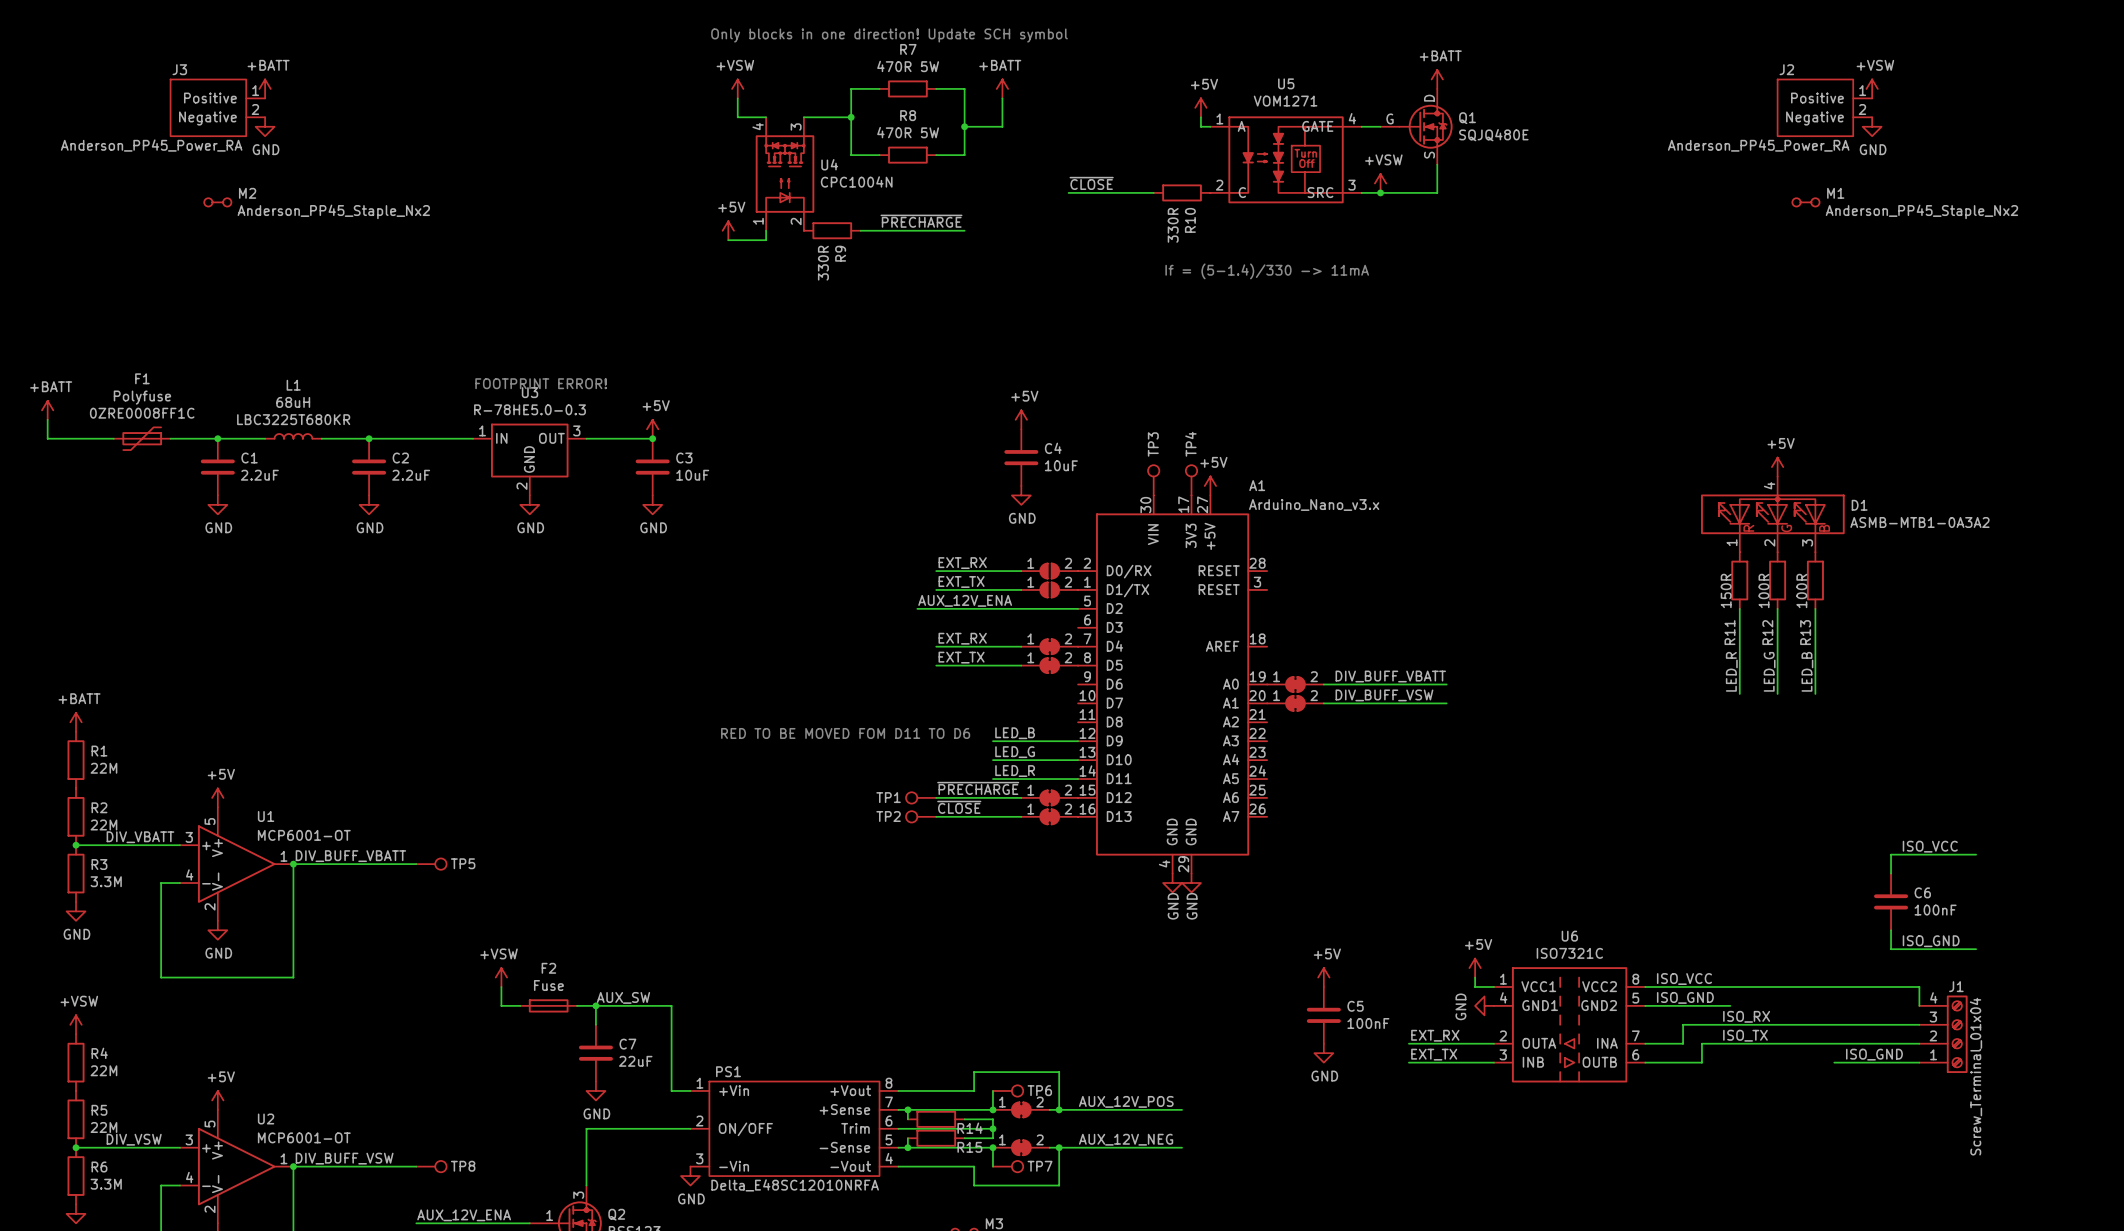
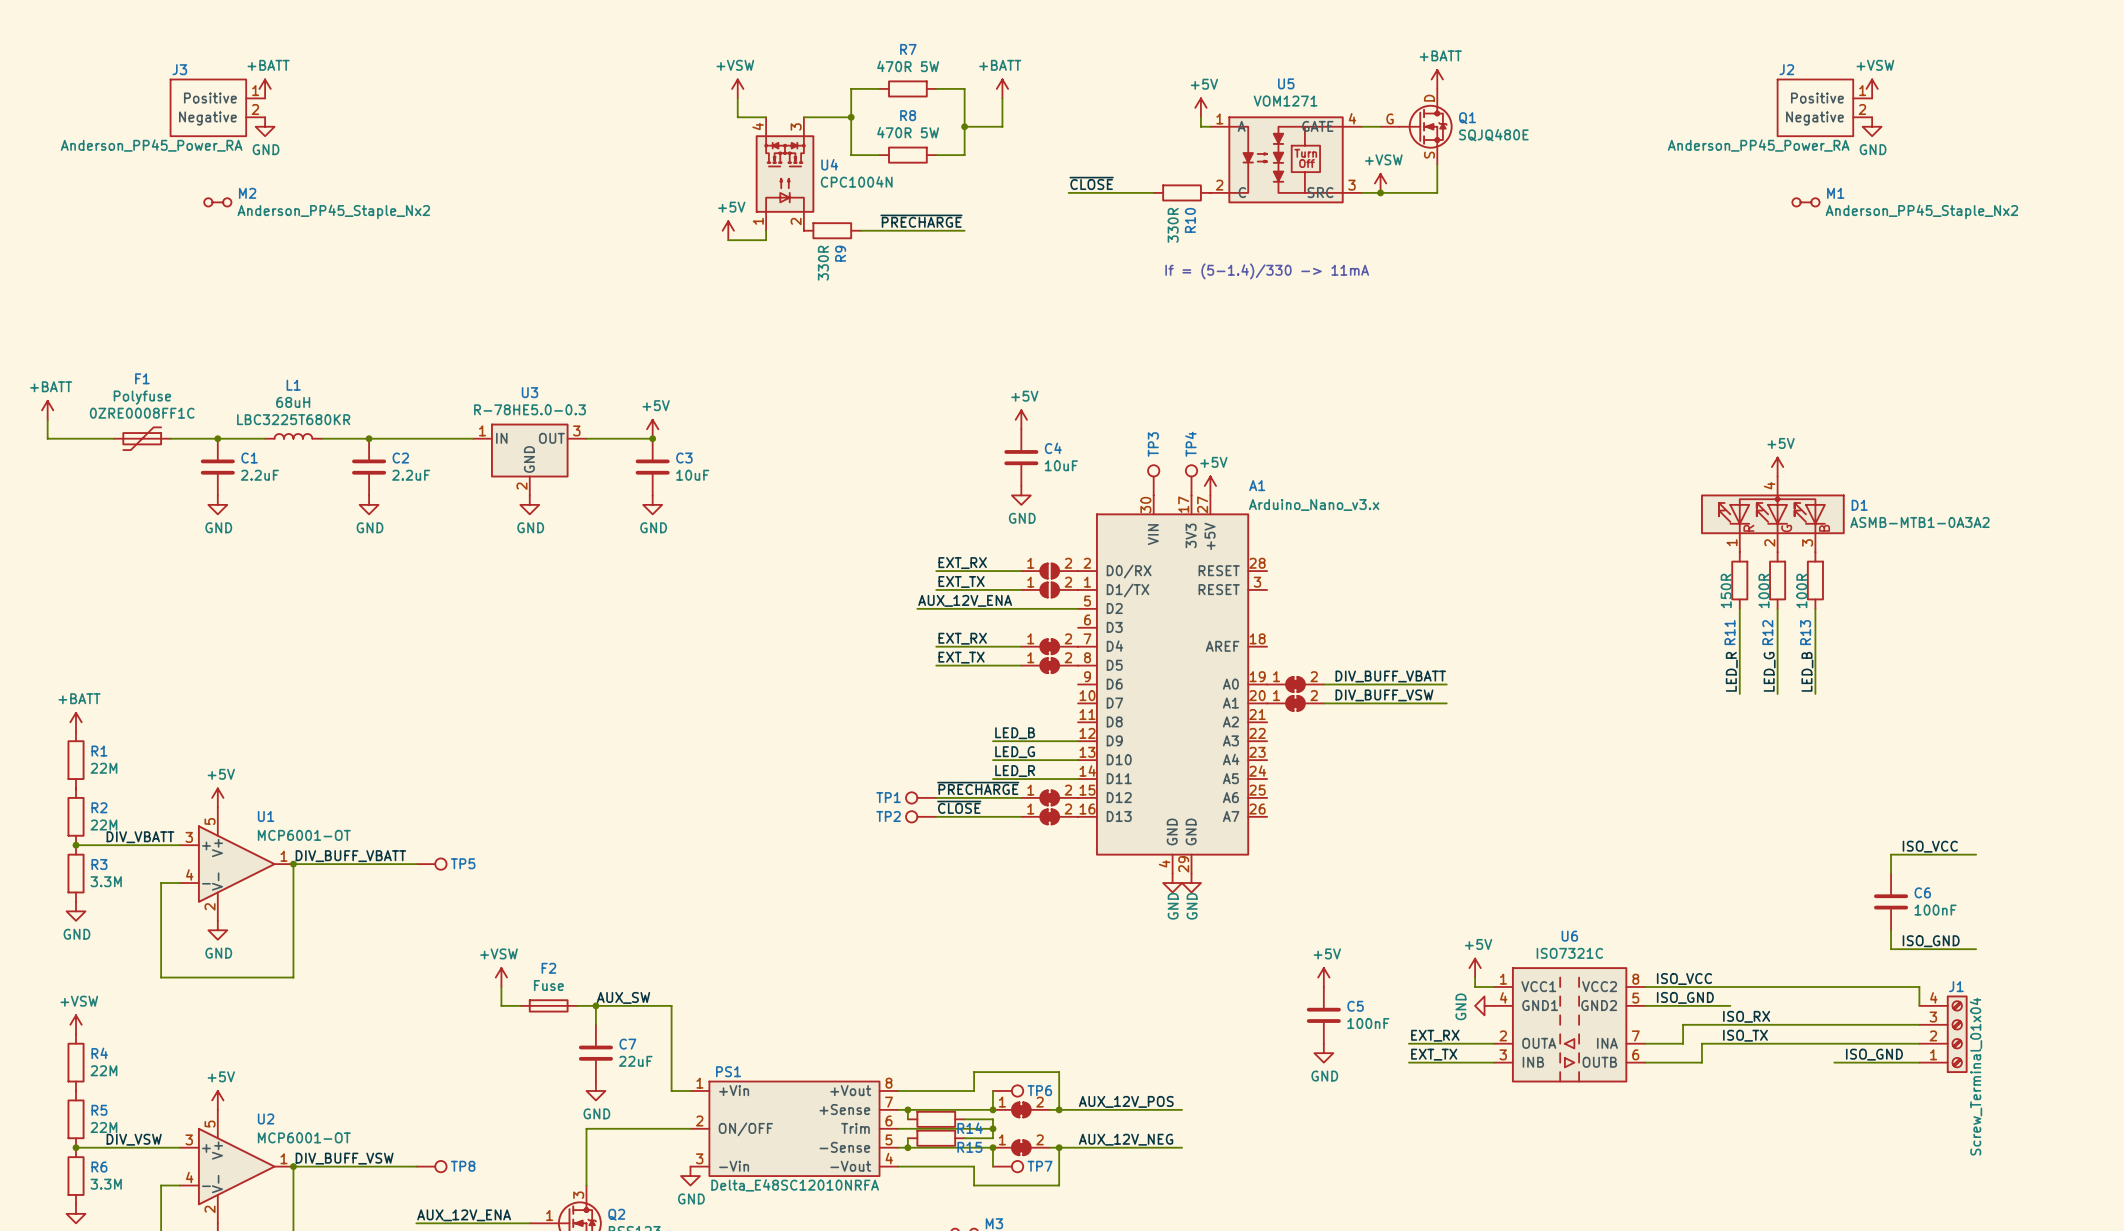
text: Only blocks in one direction! Update SCH symbol (889, 35) -> none
text: FOOTPRINT ERROR! (541, 383) -> none
text: RED TO BE MOVED FOM D11 TO D6 (845, 733) -> none

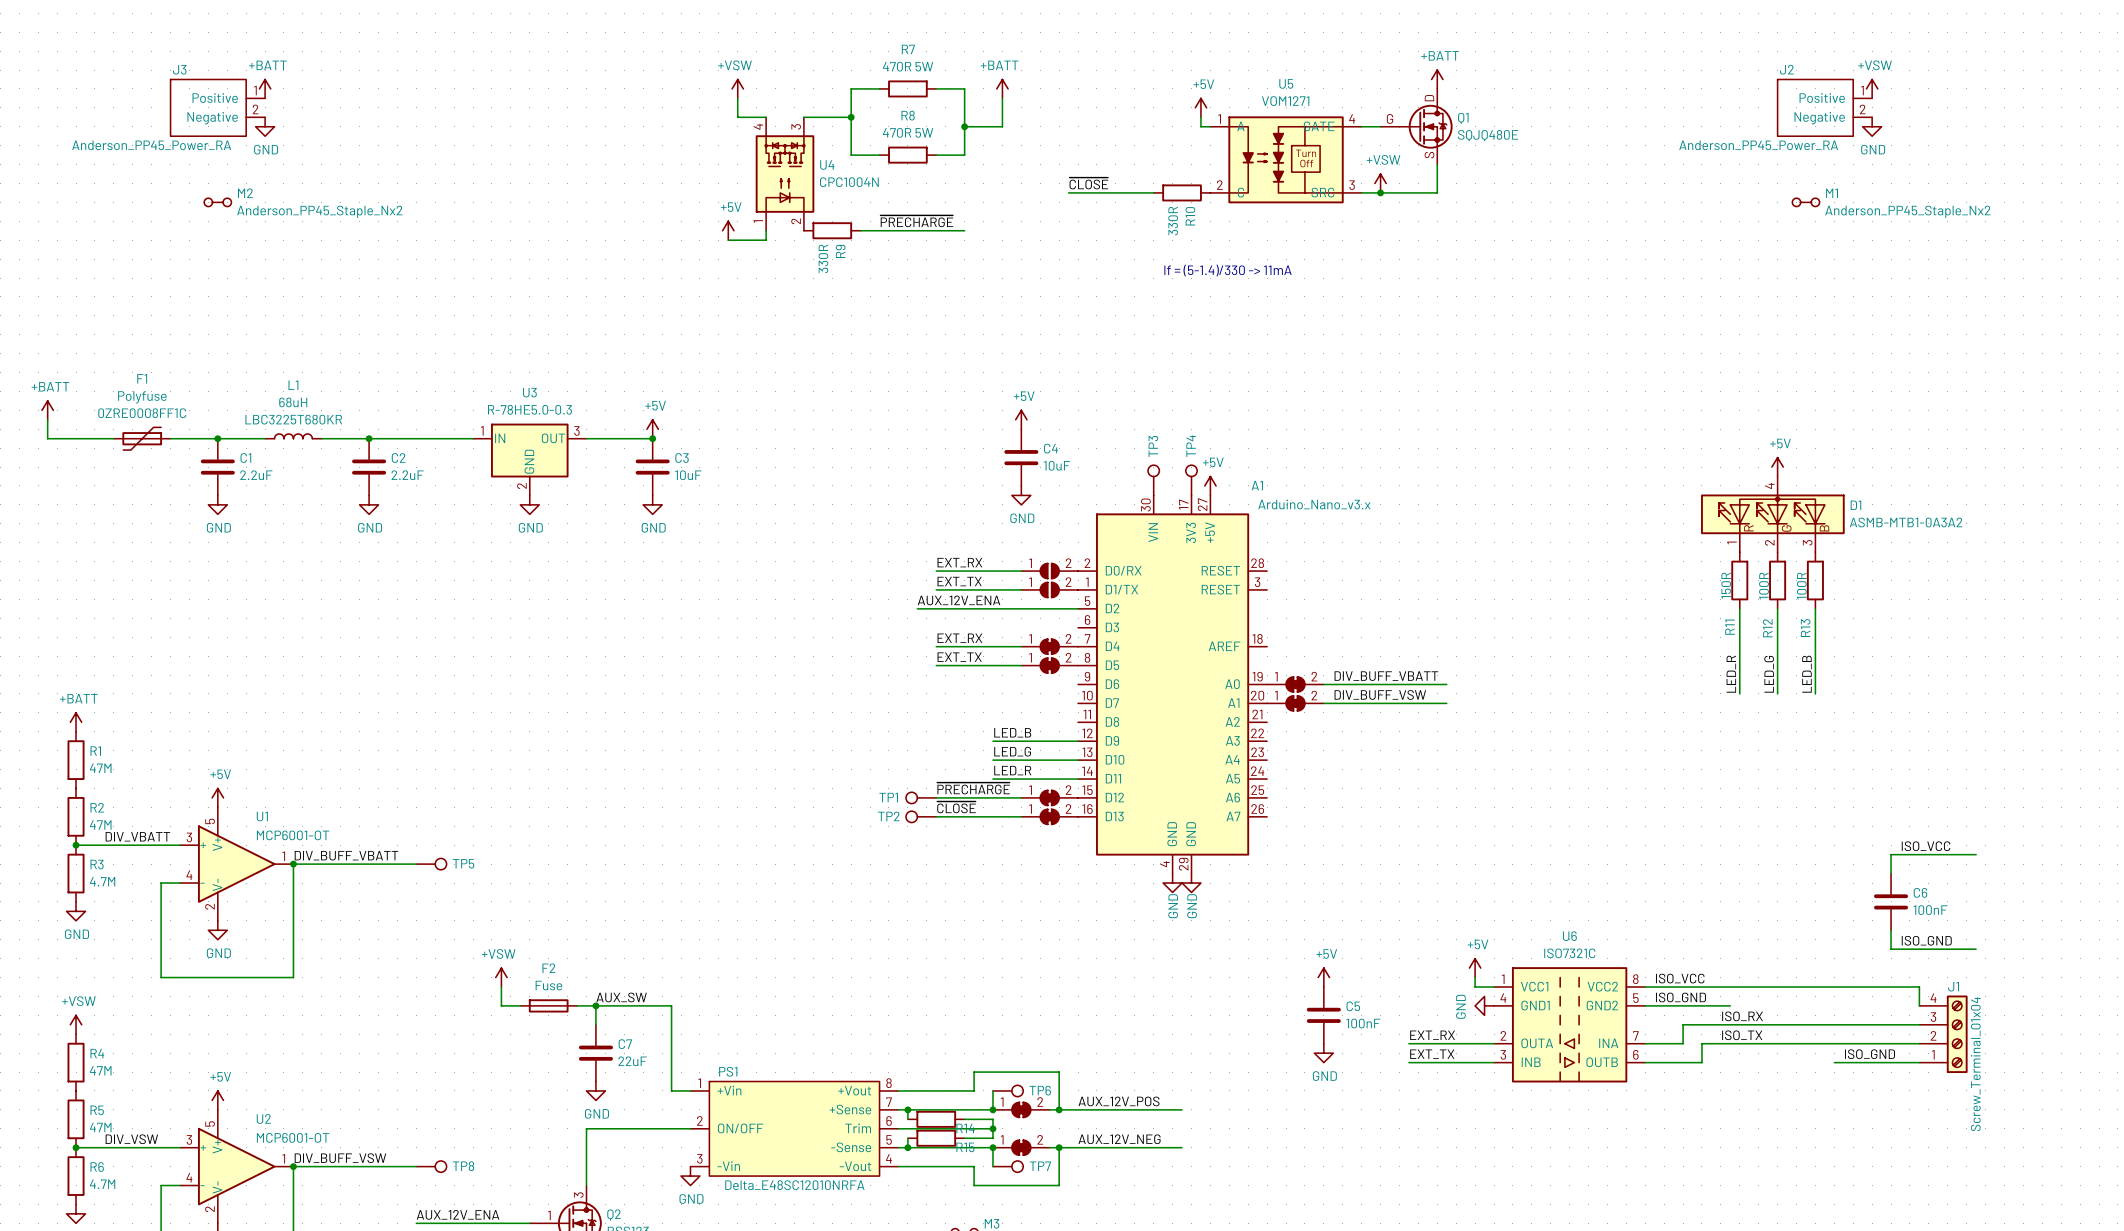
R1 value: 22M (103, 768) -> 47M (100, 768)
R2 value: 22M (103, 824) -> 47M (100, 824)
R3 value: 3.3M (106, 881) -> 4.7M (102, 881)
R4 value: 22M (103, 1070) -> 47M (100, 1070)
R5 value: 22M (103, 1127) -> 47M (100, 1127)
R6 value: 3.3M (106, 1184) -> 4.7M (102, 1184)

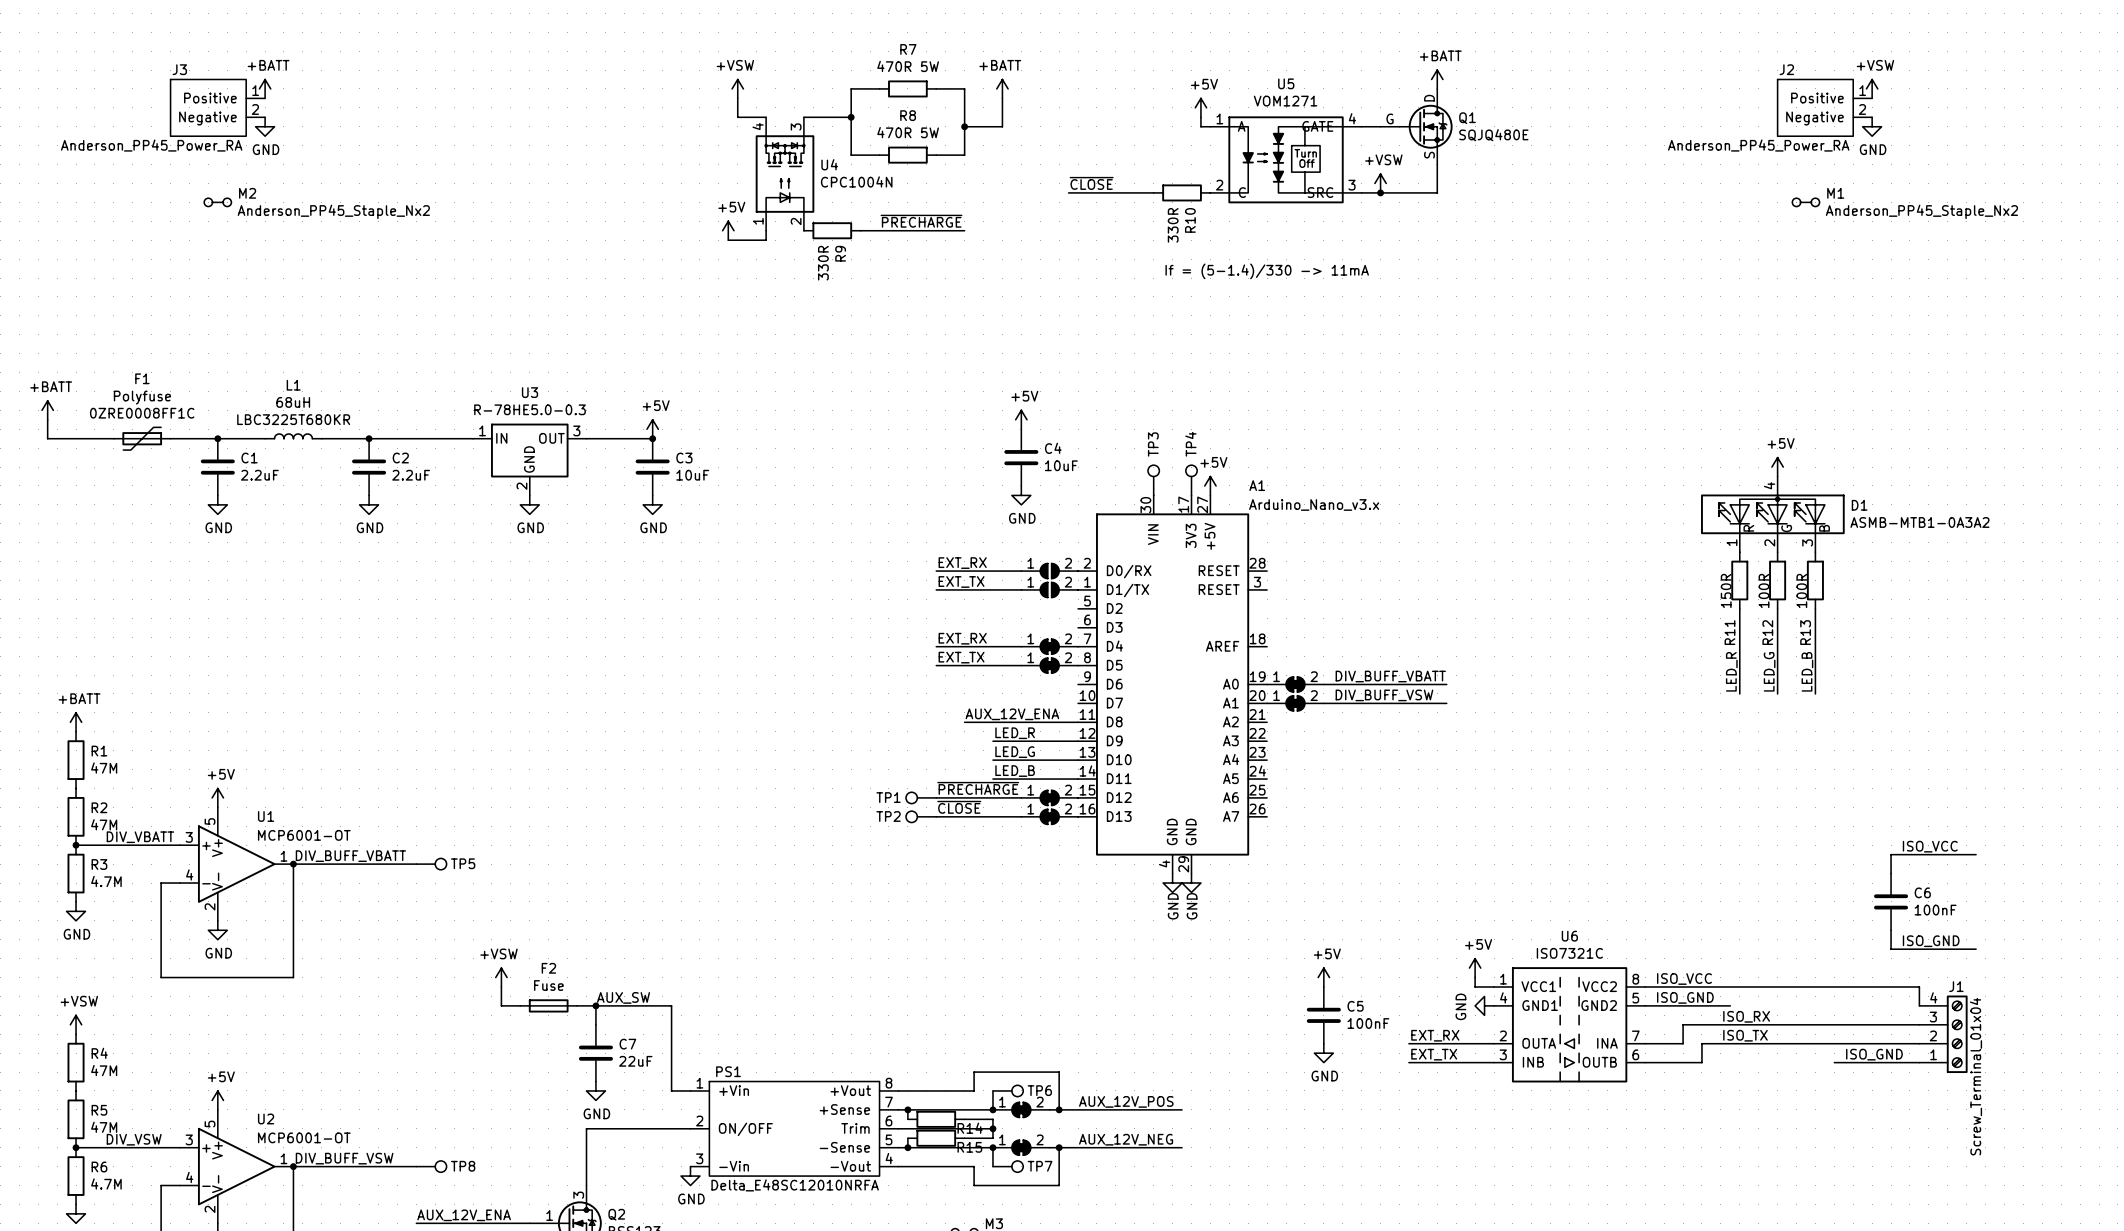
label position: AUX_12V_ENA (959, 600) -> AUX_12V_ENA (1012, 714)
wire: (917, 608) (1078, 608) -> none
wire: none -> (964, 722) (1078, 722)
label: LED_B (1012, 732) -> LED_R (1015, 733)
label: LED_R (1012, 770) -> LED_B (1015, 771)

